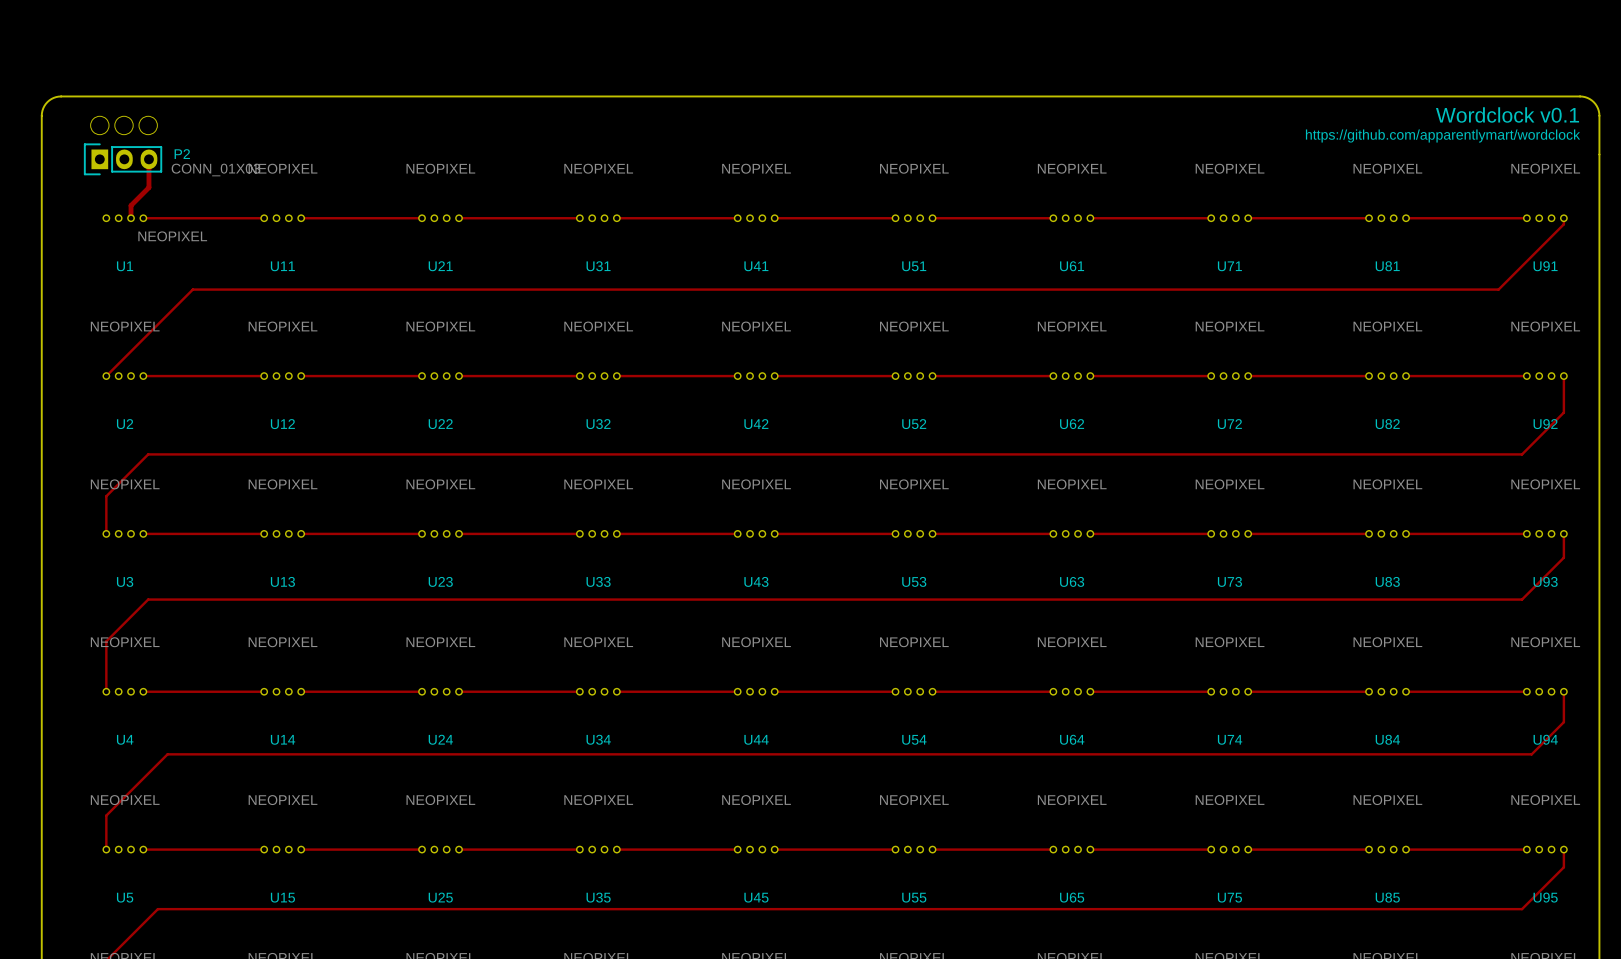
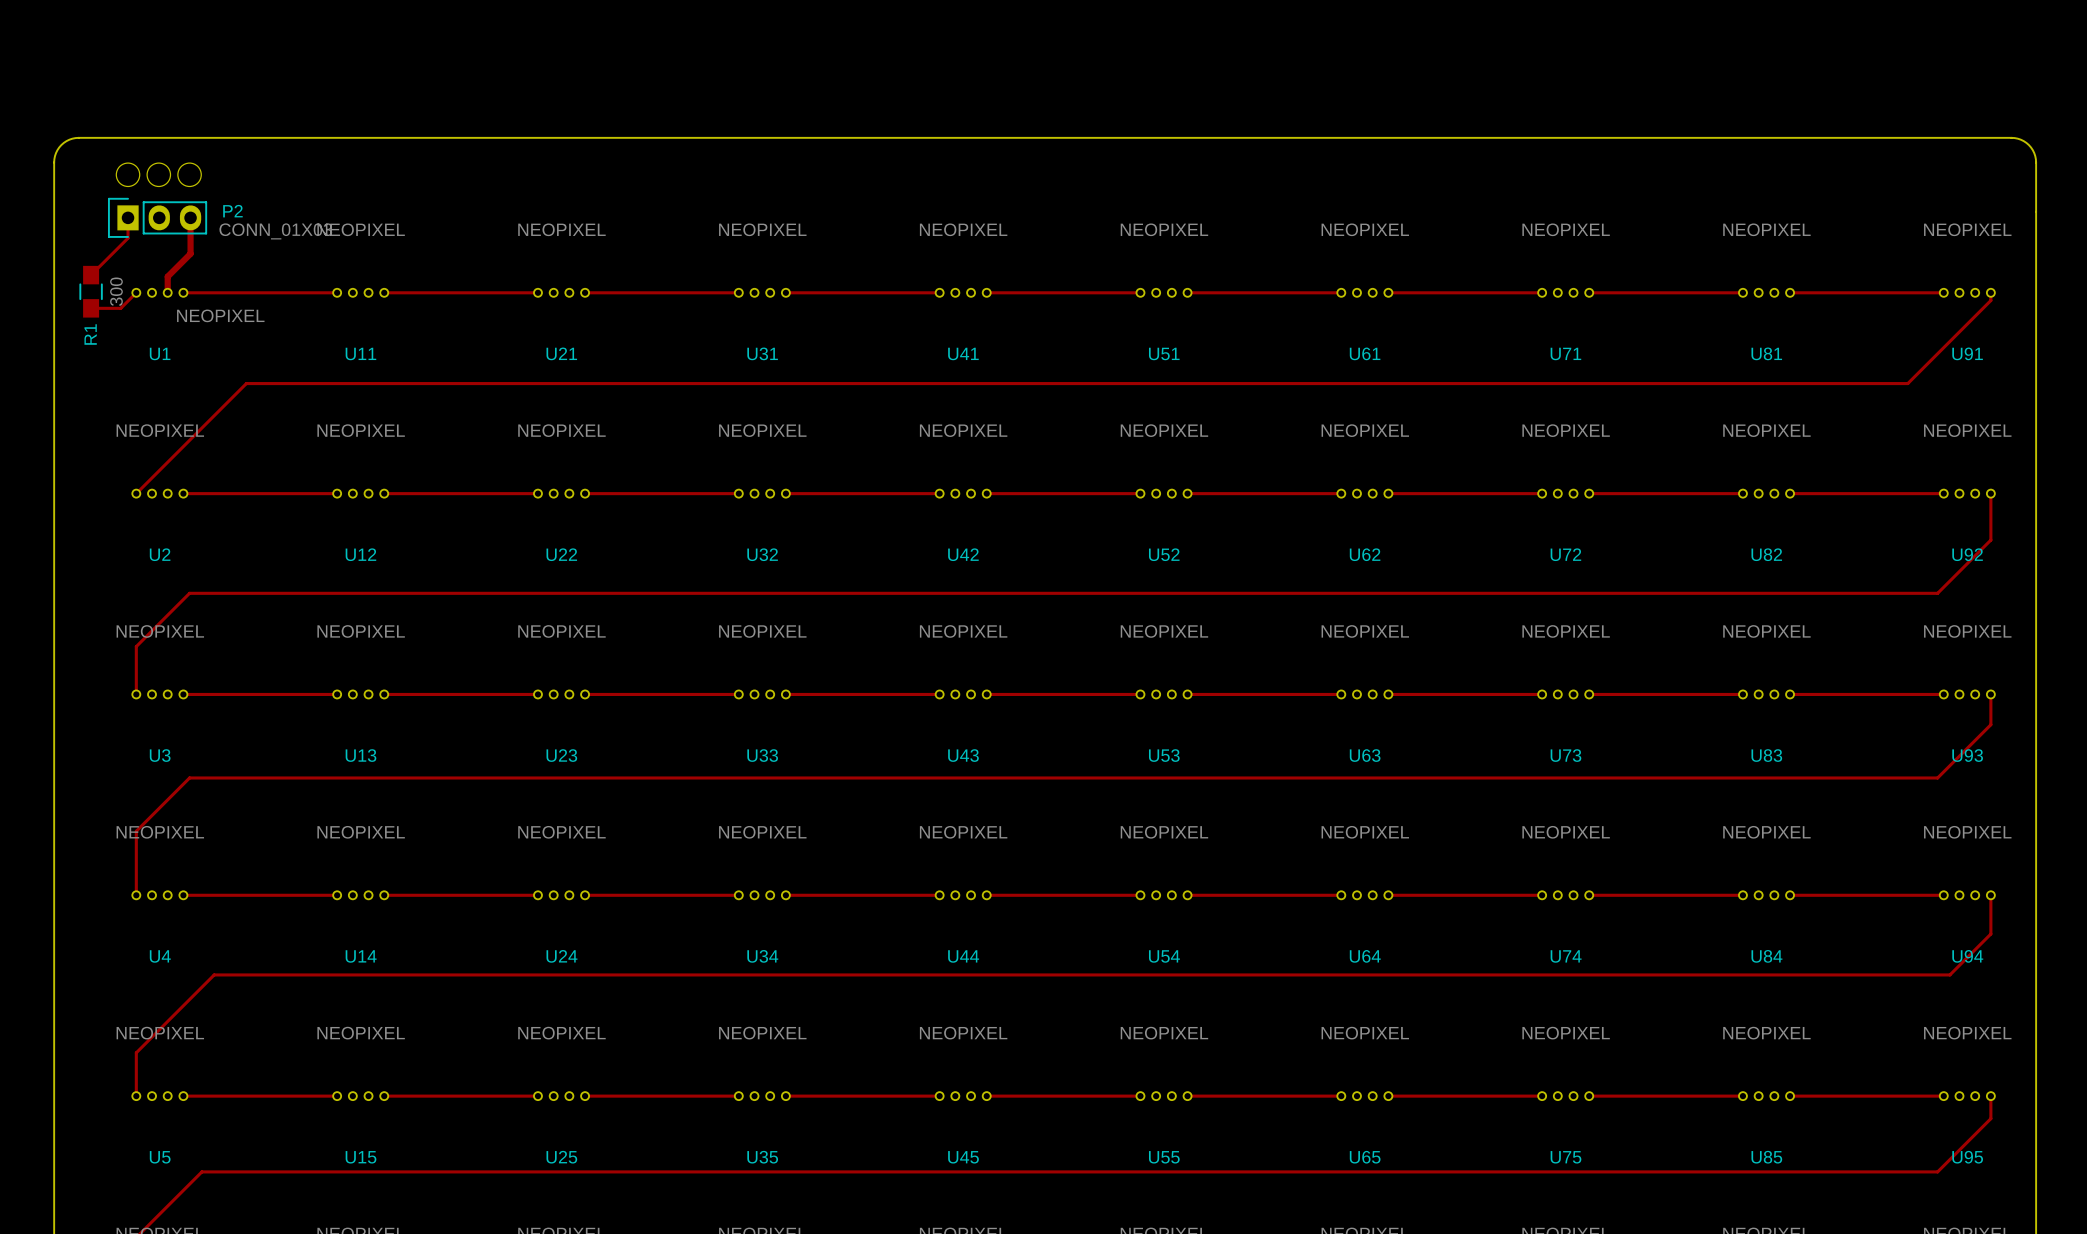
text: Wordclock v0.1 (1507, 114) -> none
text: https://github.com/apparentlymart/wordclock (1443, 135) -> none
track: none -> (128, 217) (128, 238) (91, 275)
R1: none -> 300 (91, 291)
track: none -> (136, 292) (120, 308) (91, 308)

